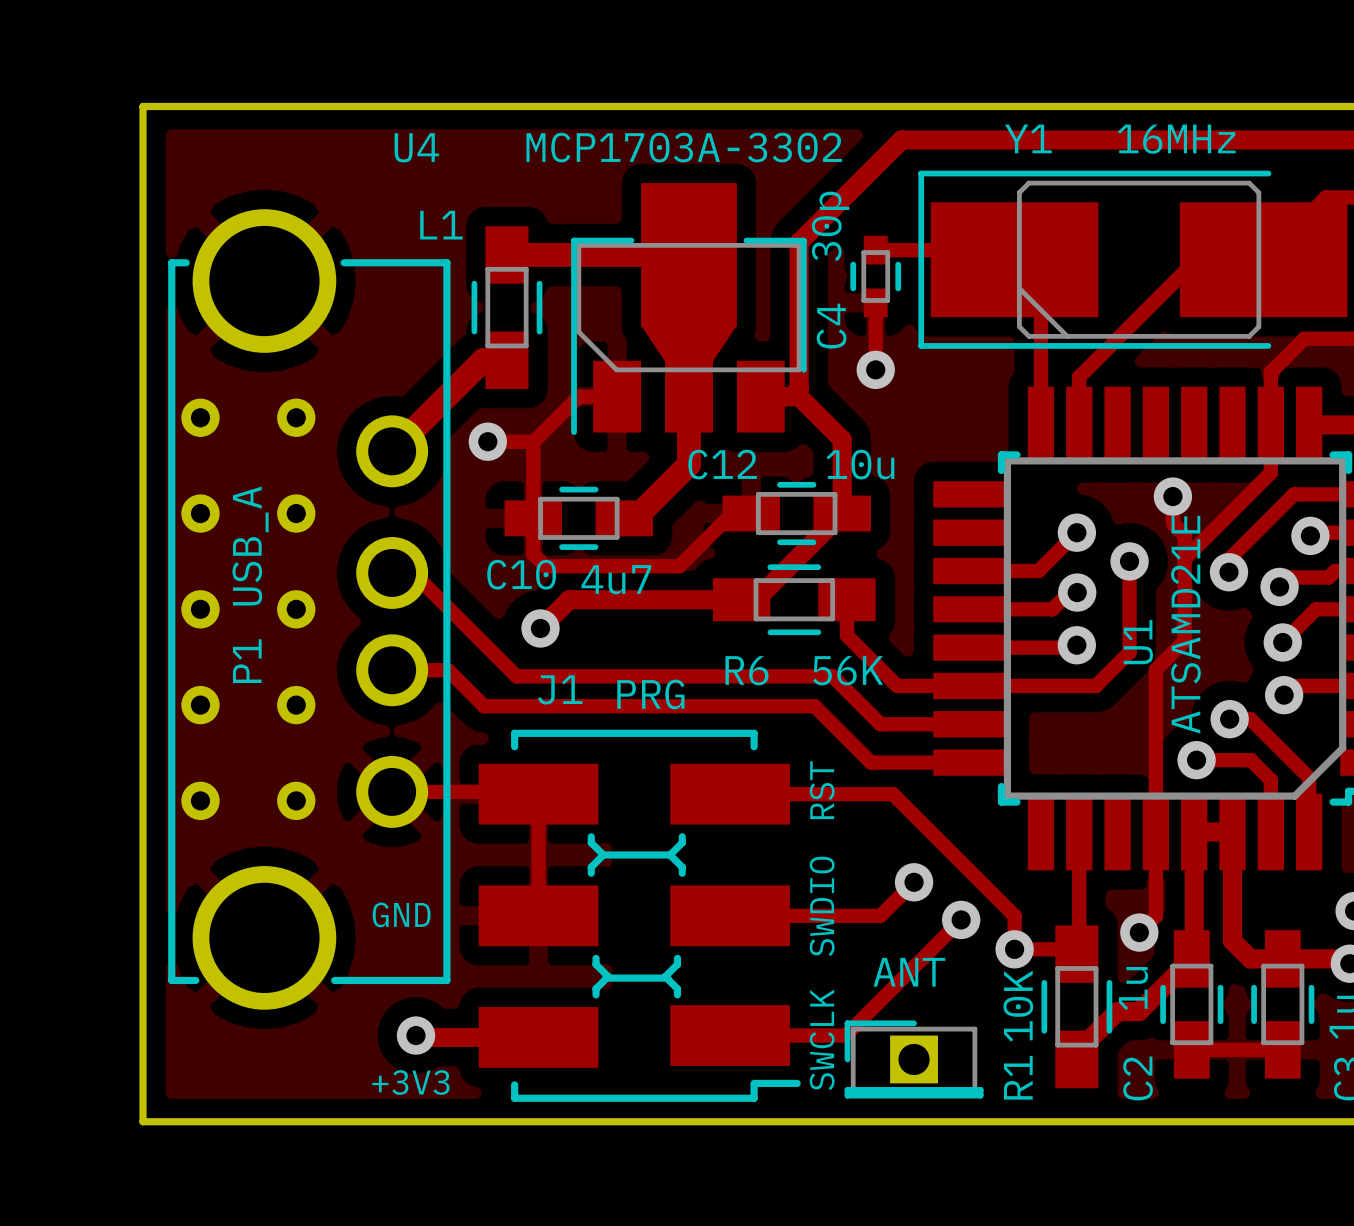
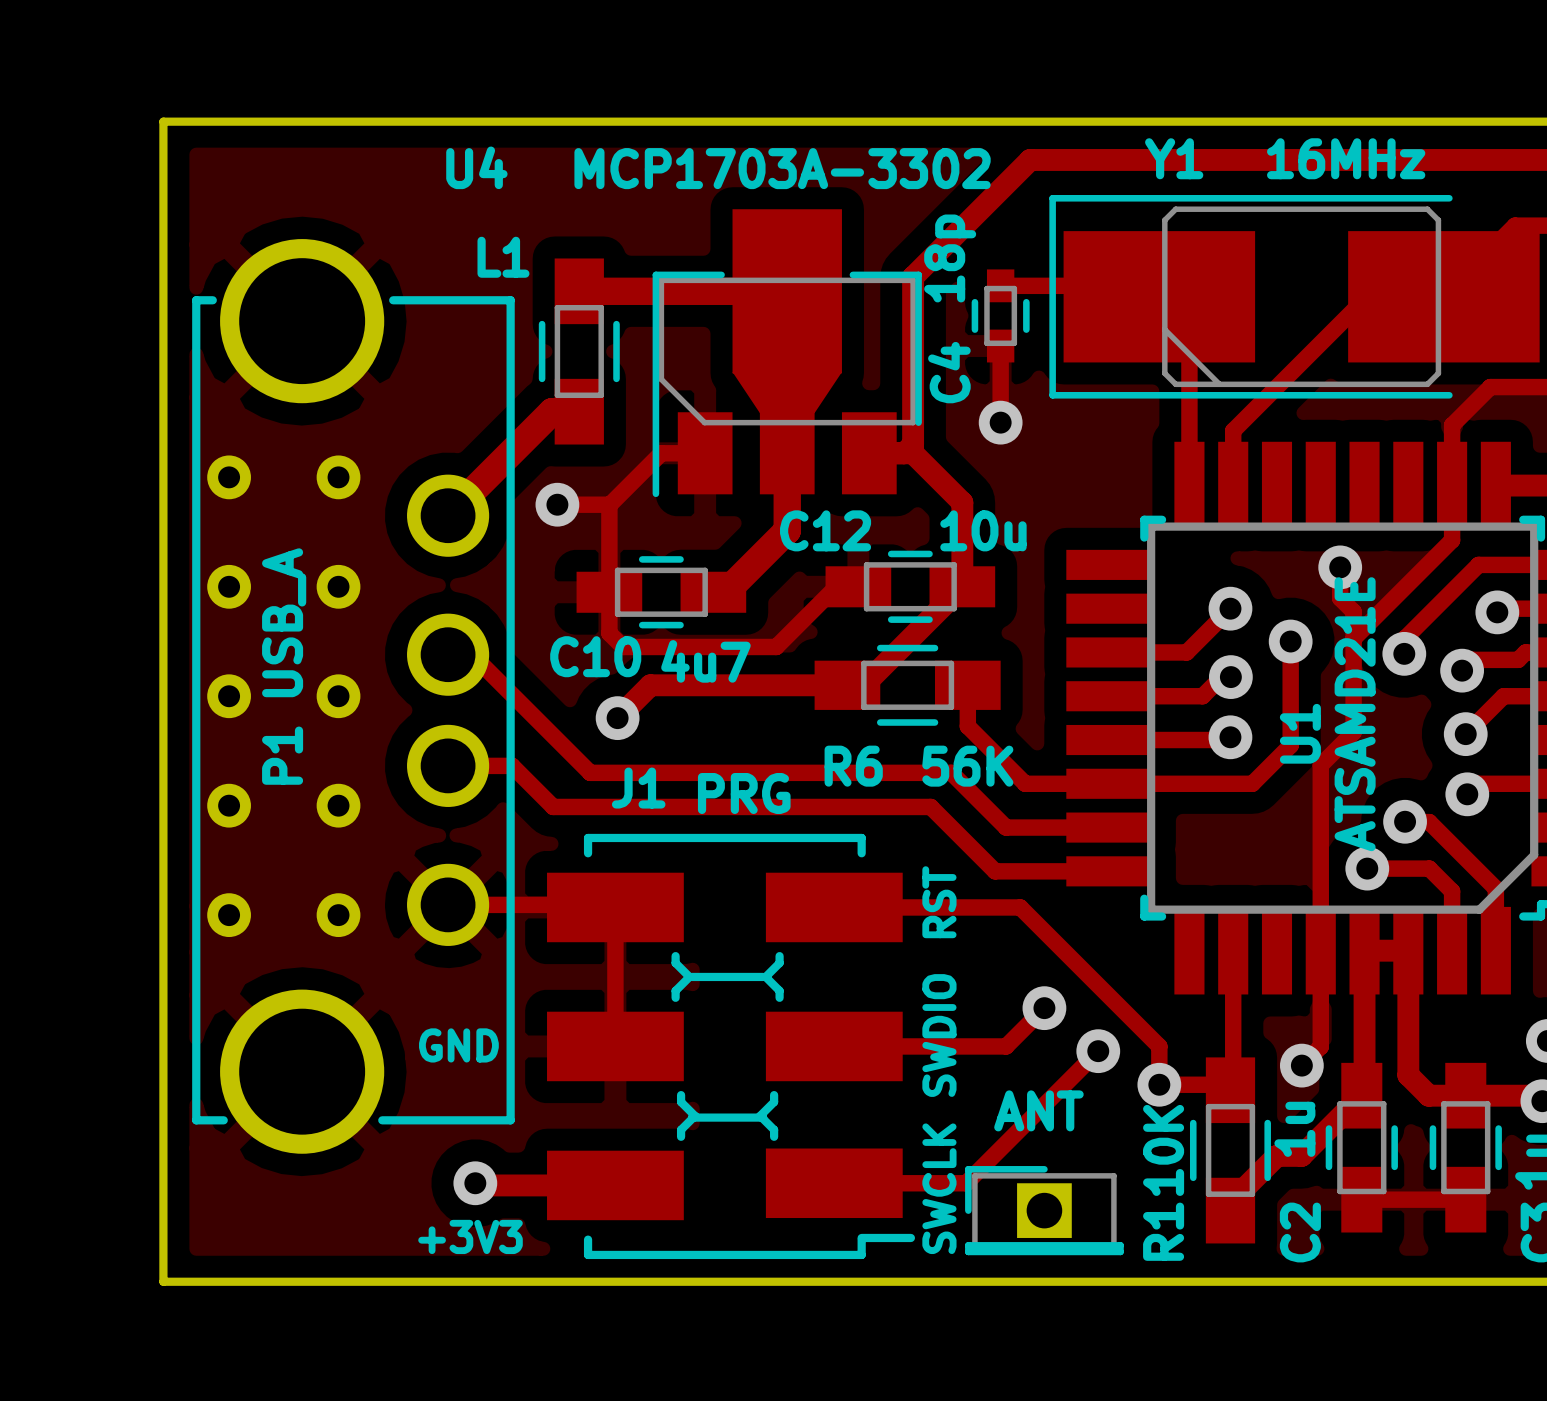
C4 value: 30p (830, 226) -> 18p (950, 258)

